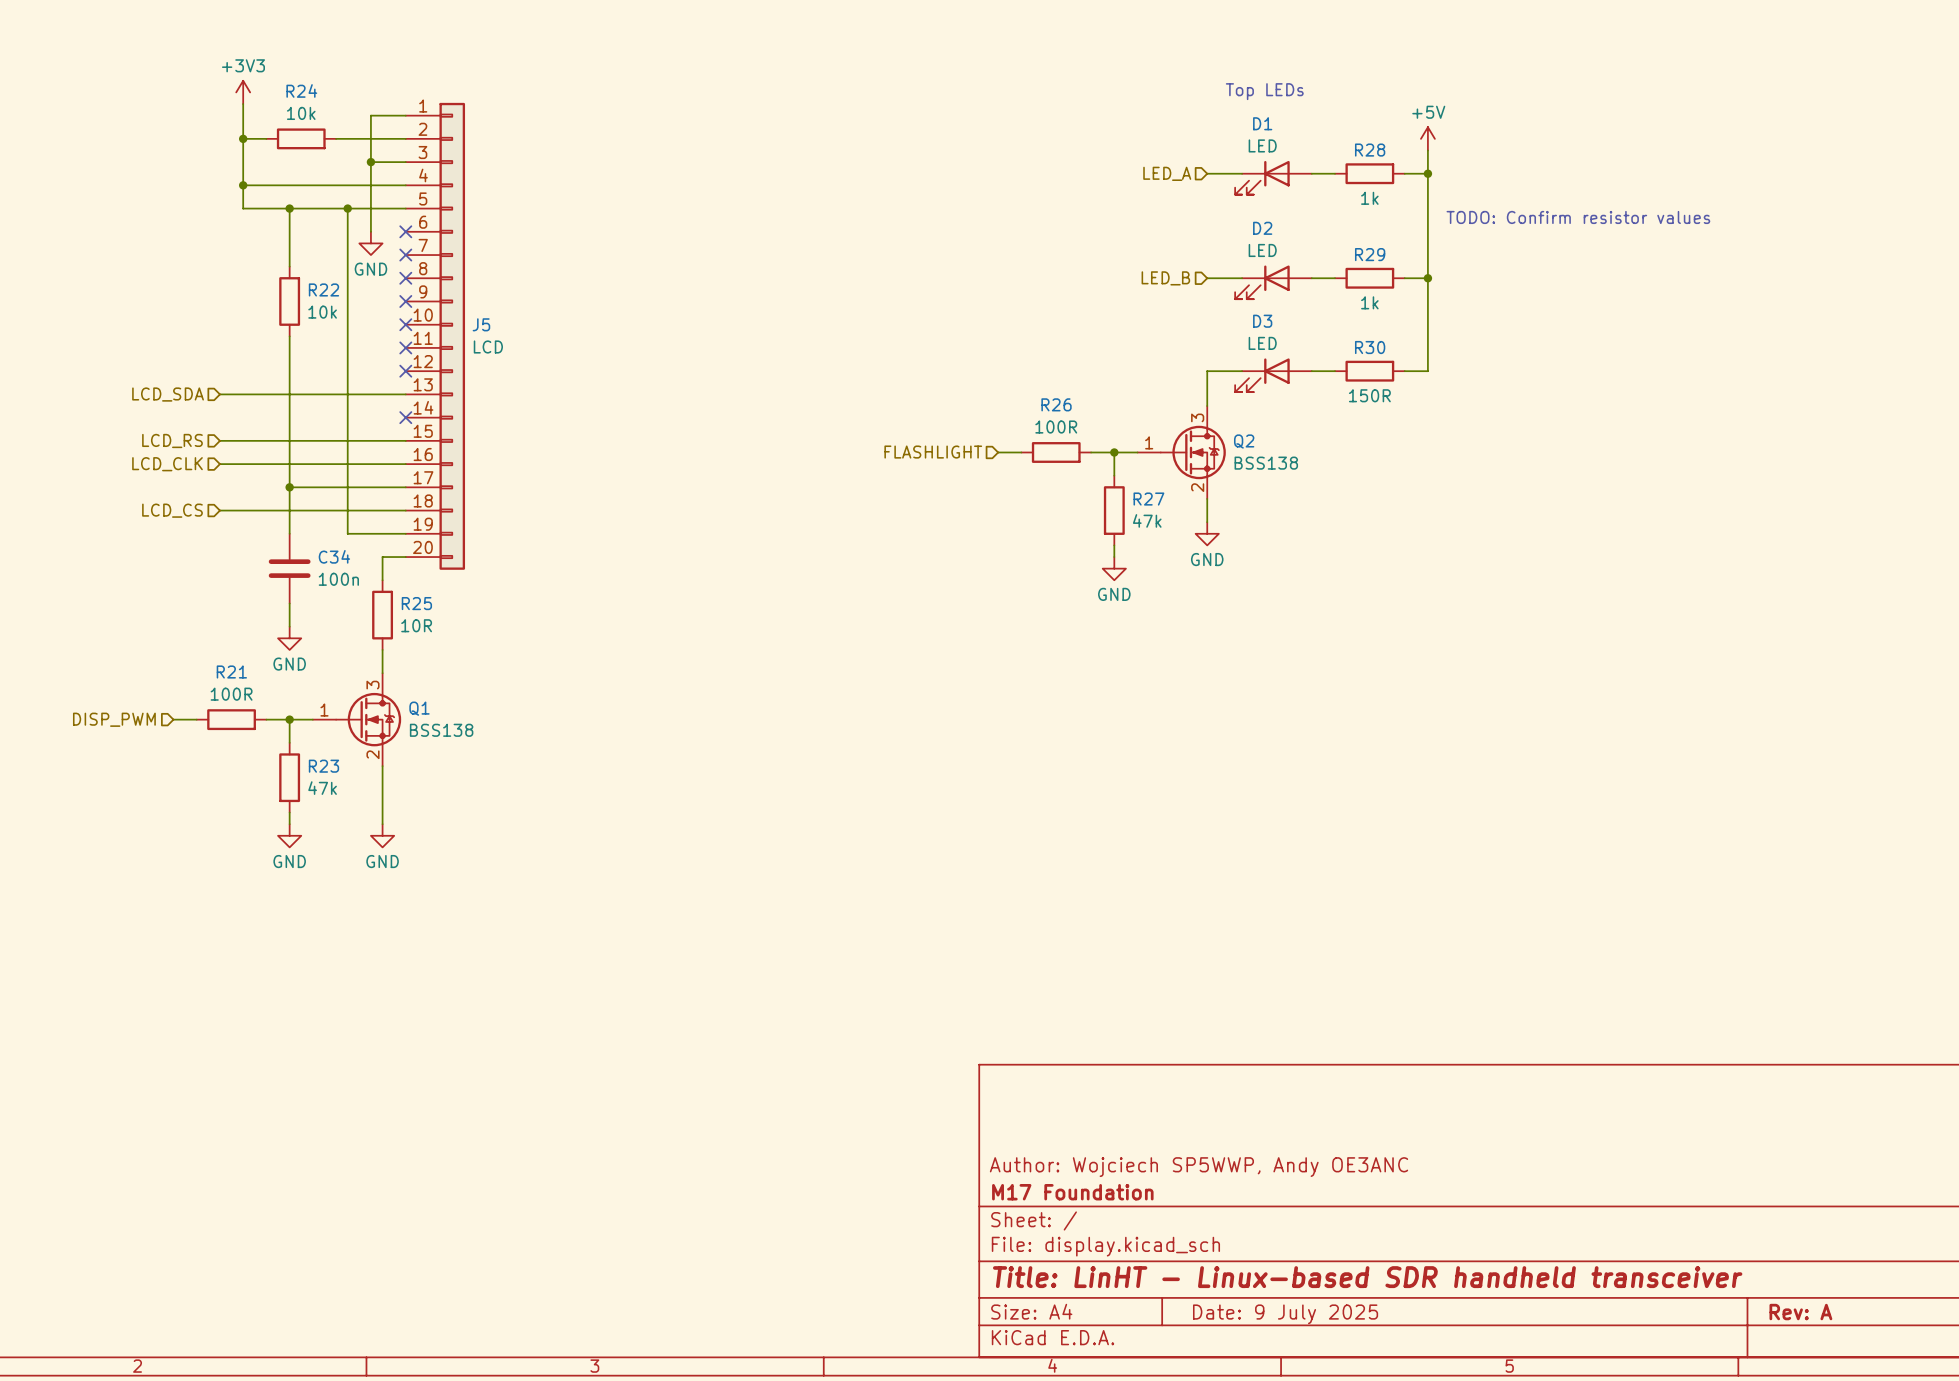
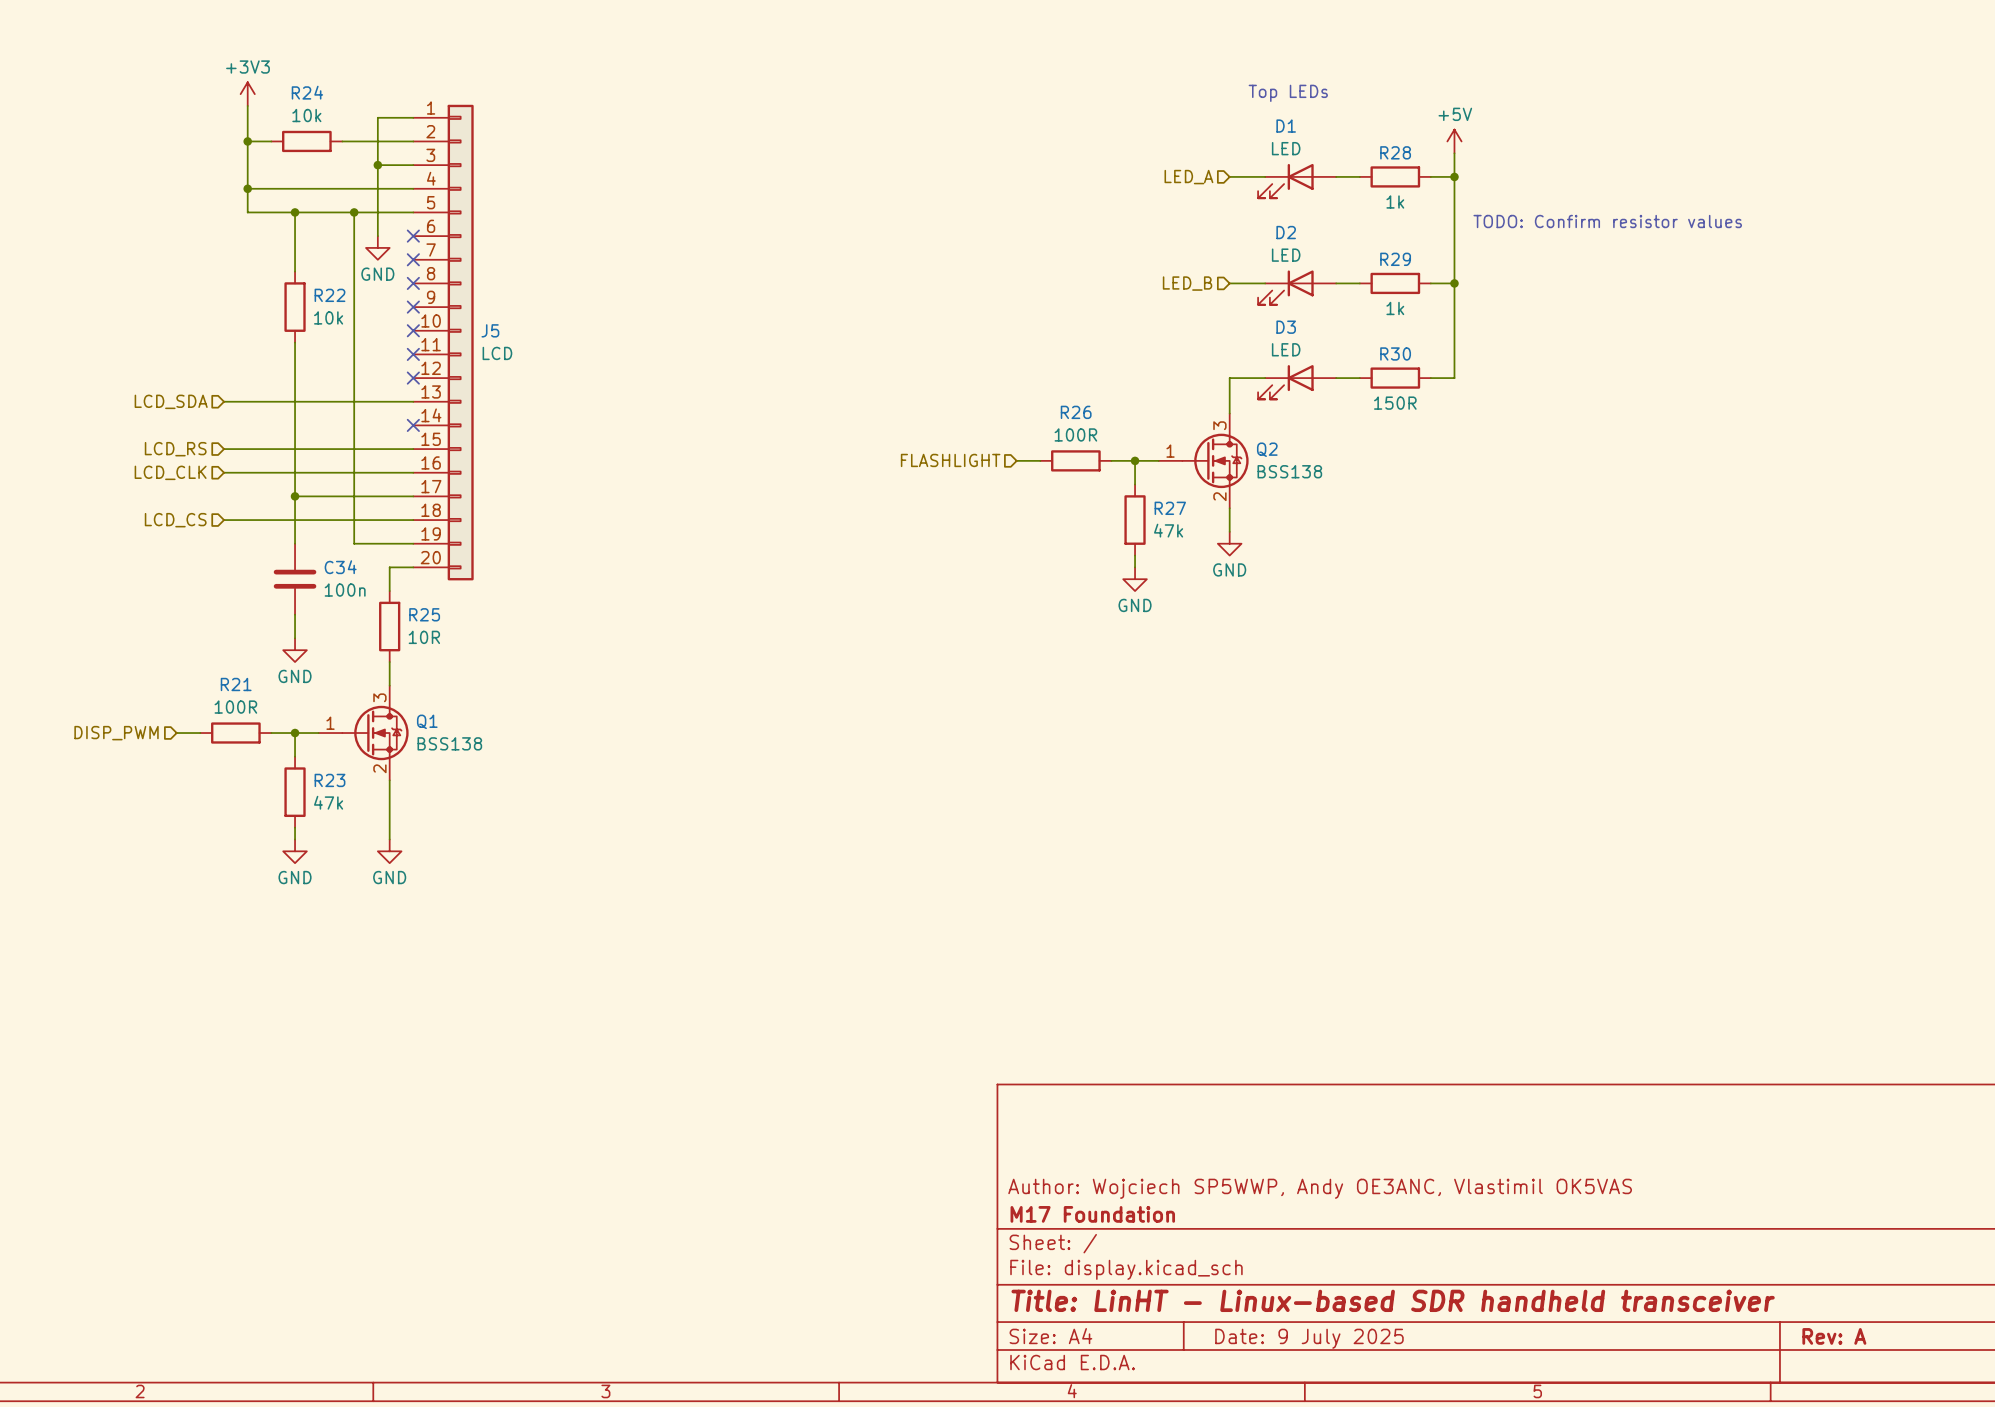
title block: Author: Wojciech SP5WWP, Andy OE3ANC (1199, 1167) -> Author: Wojciech SP5WWP, Andy OE3ANC, Vlastimil OK5VAS (1320, 1188)

